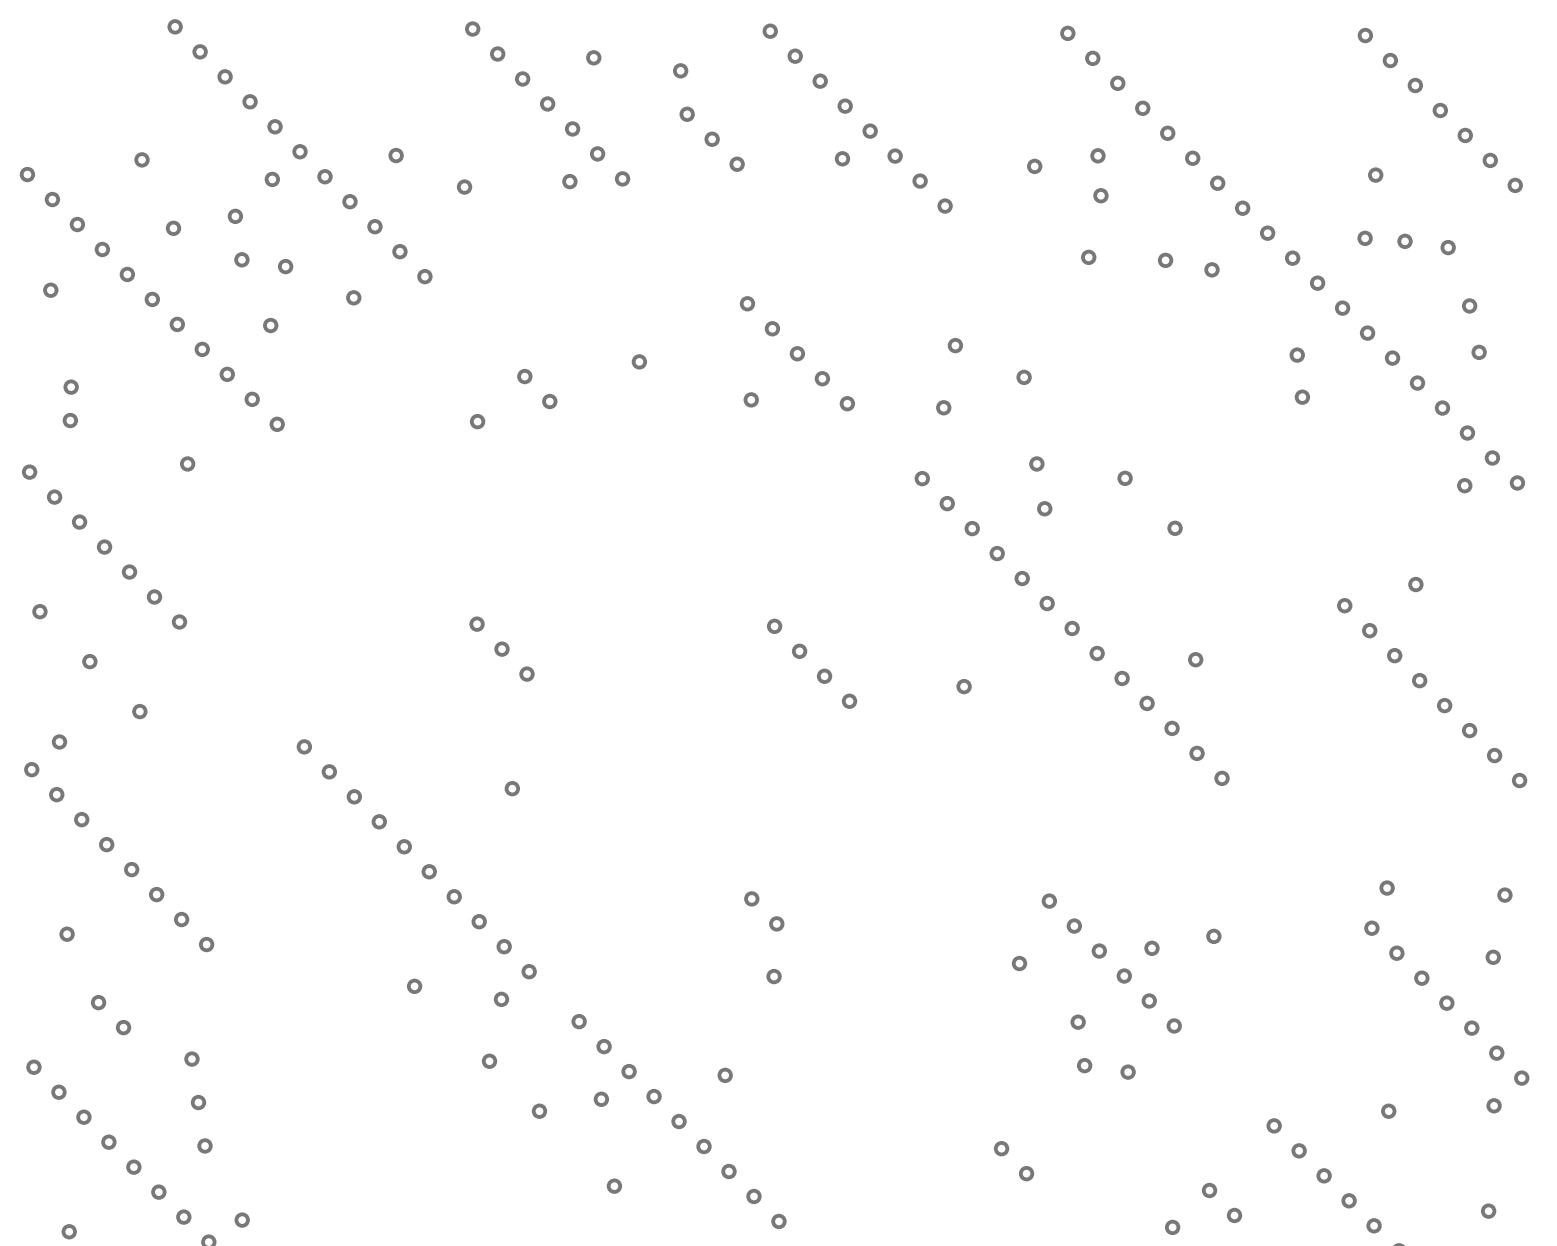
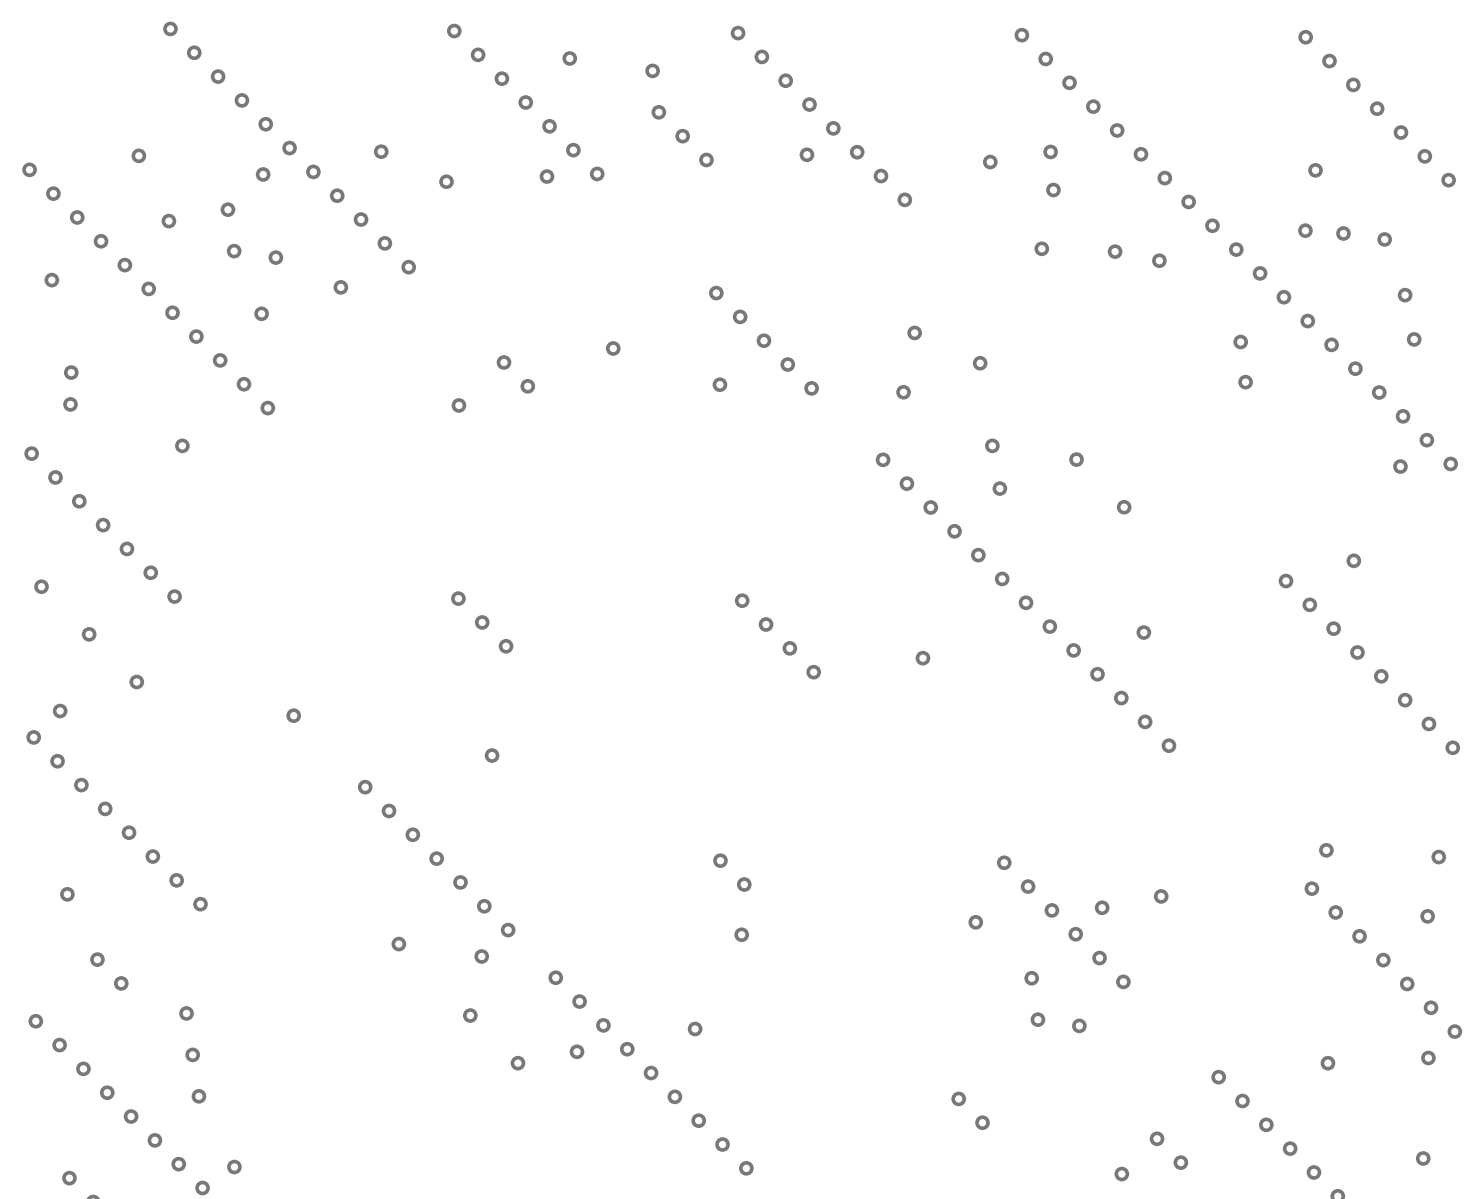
via: (329, 771) -> none
via: (354, 796) -> none
via: (614, 1186) -> none

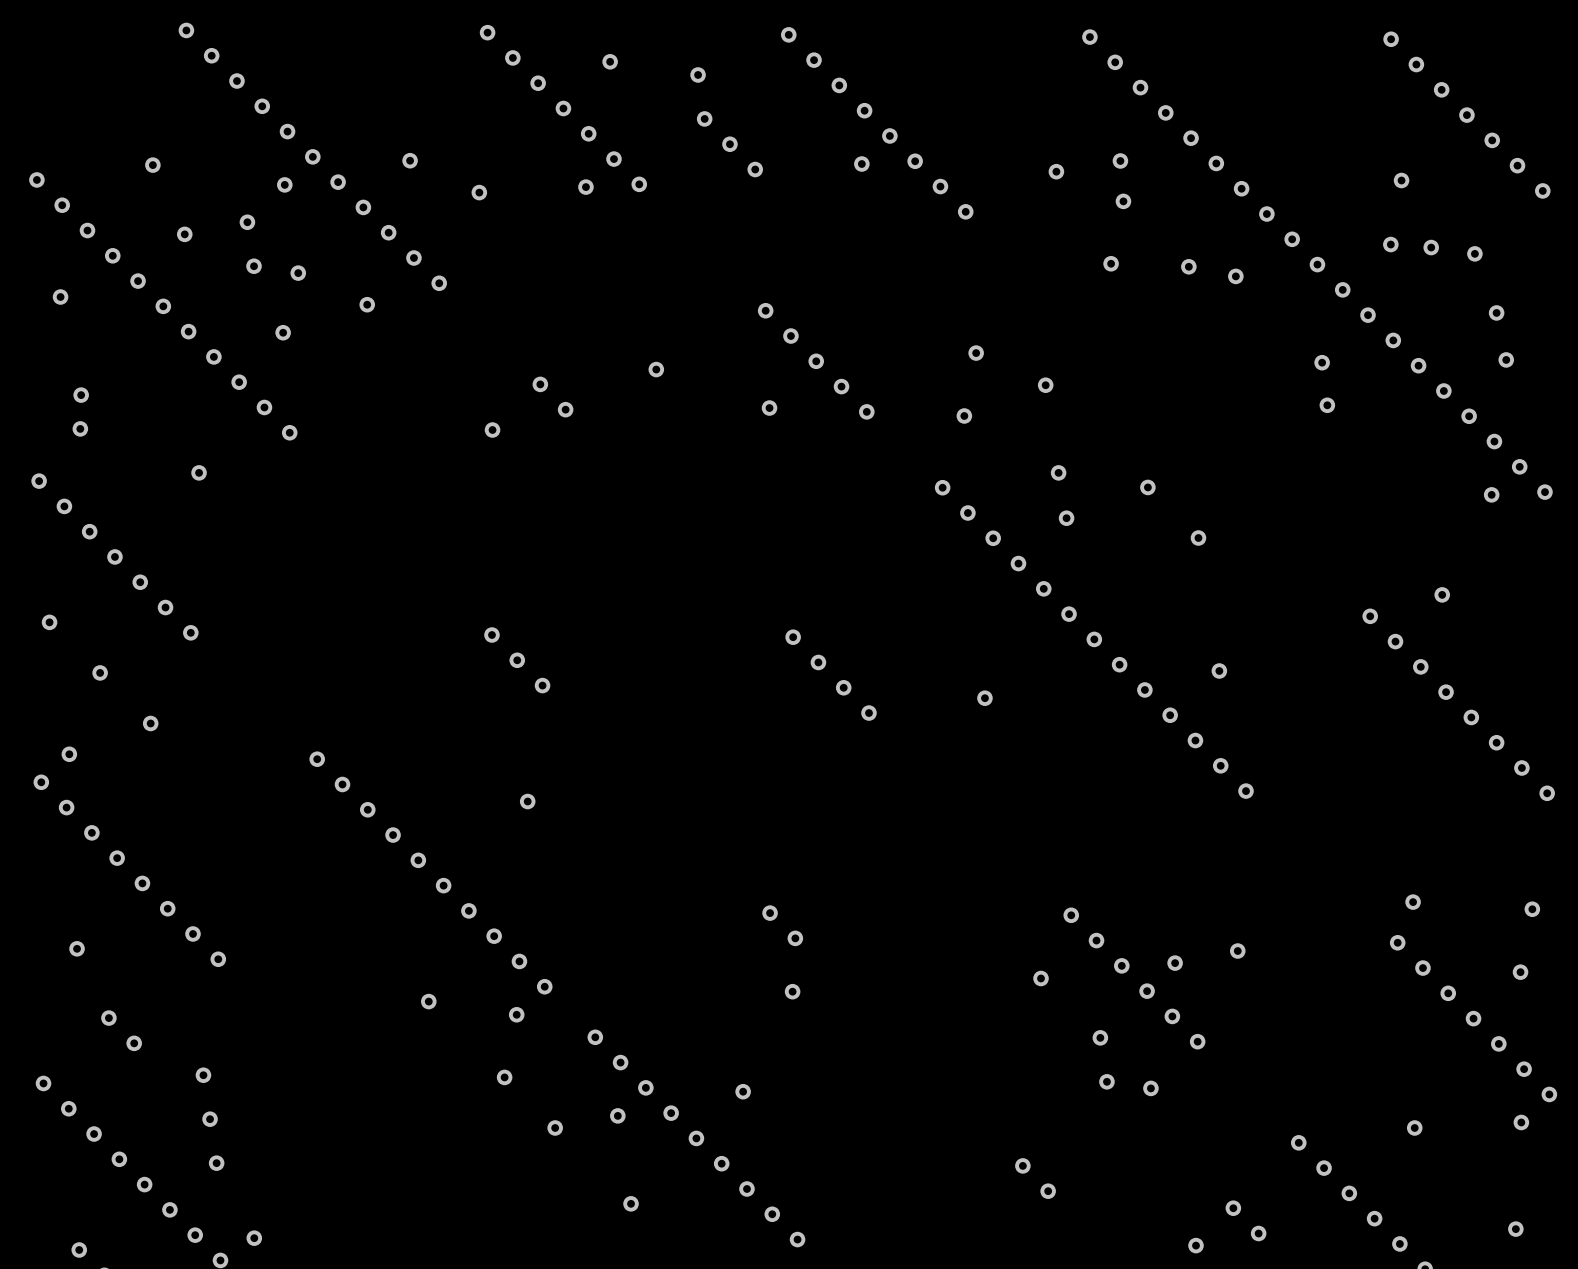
via: none -> (342, 784)
via: none -> (367, 809)
via: none -> (631, 1203)

